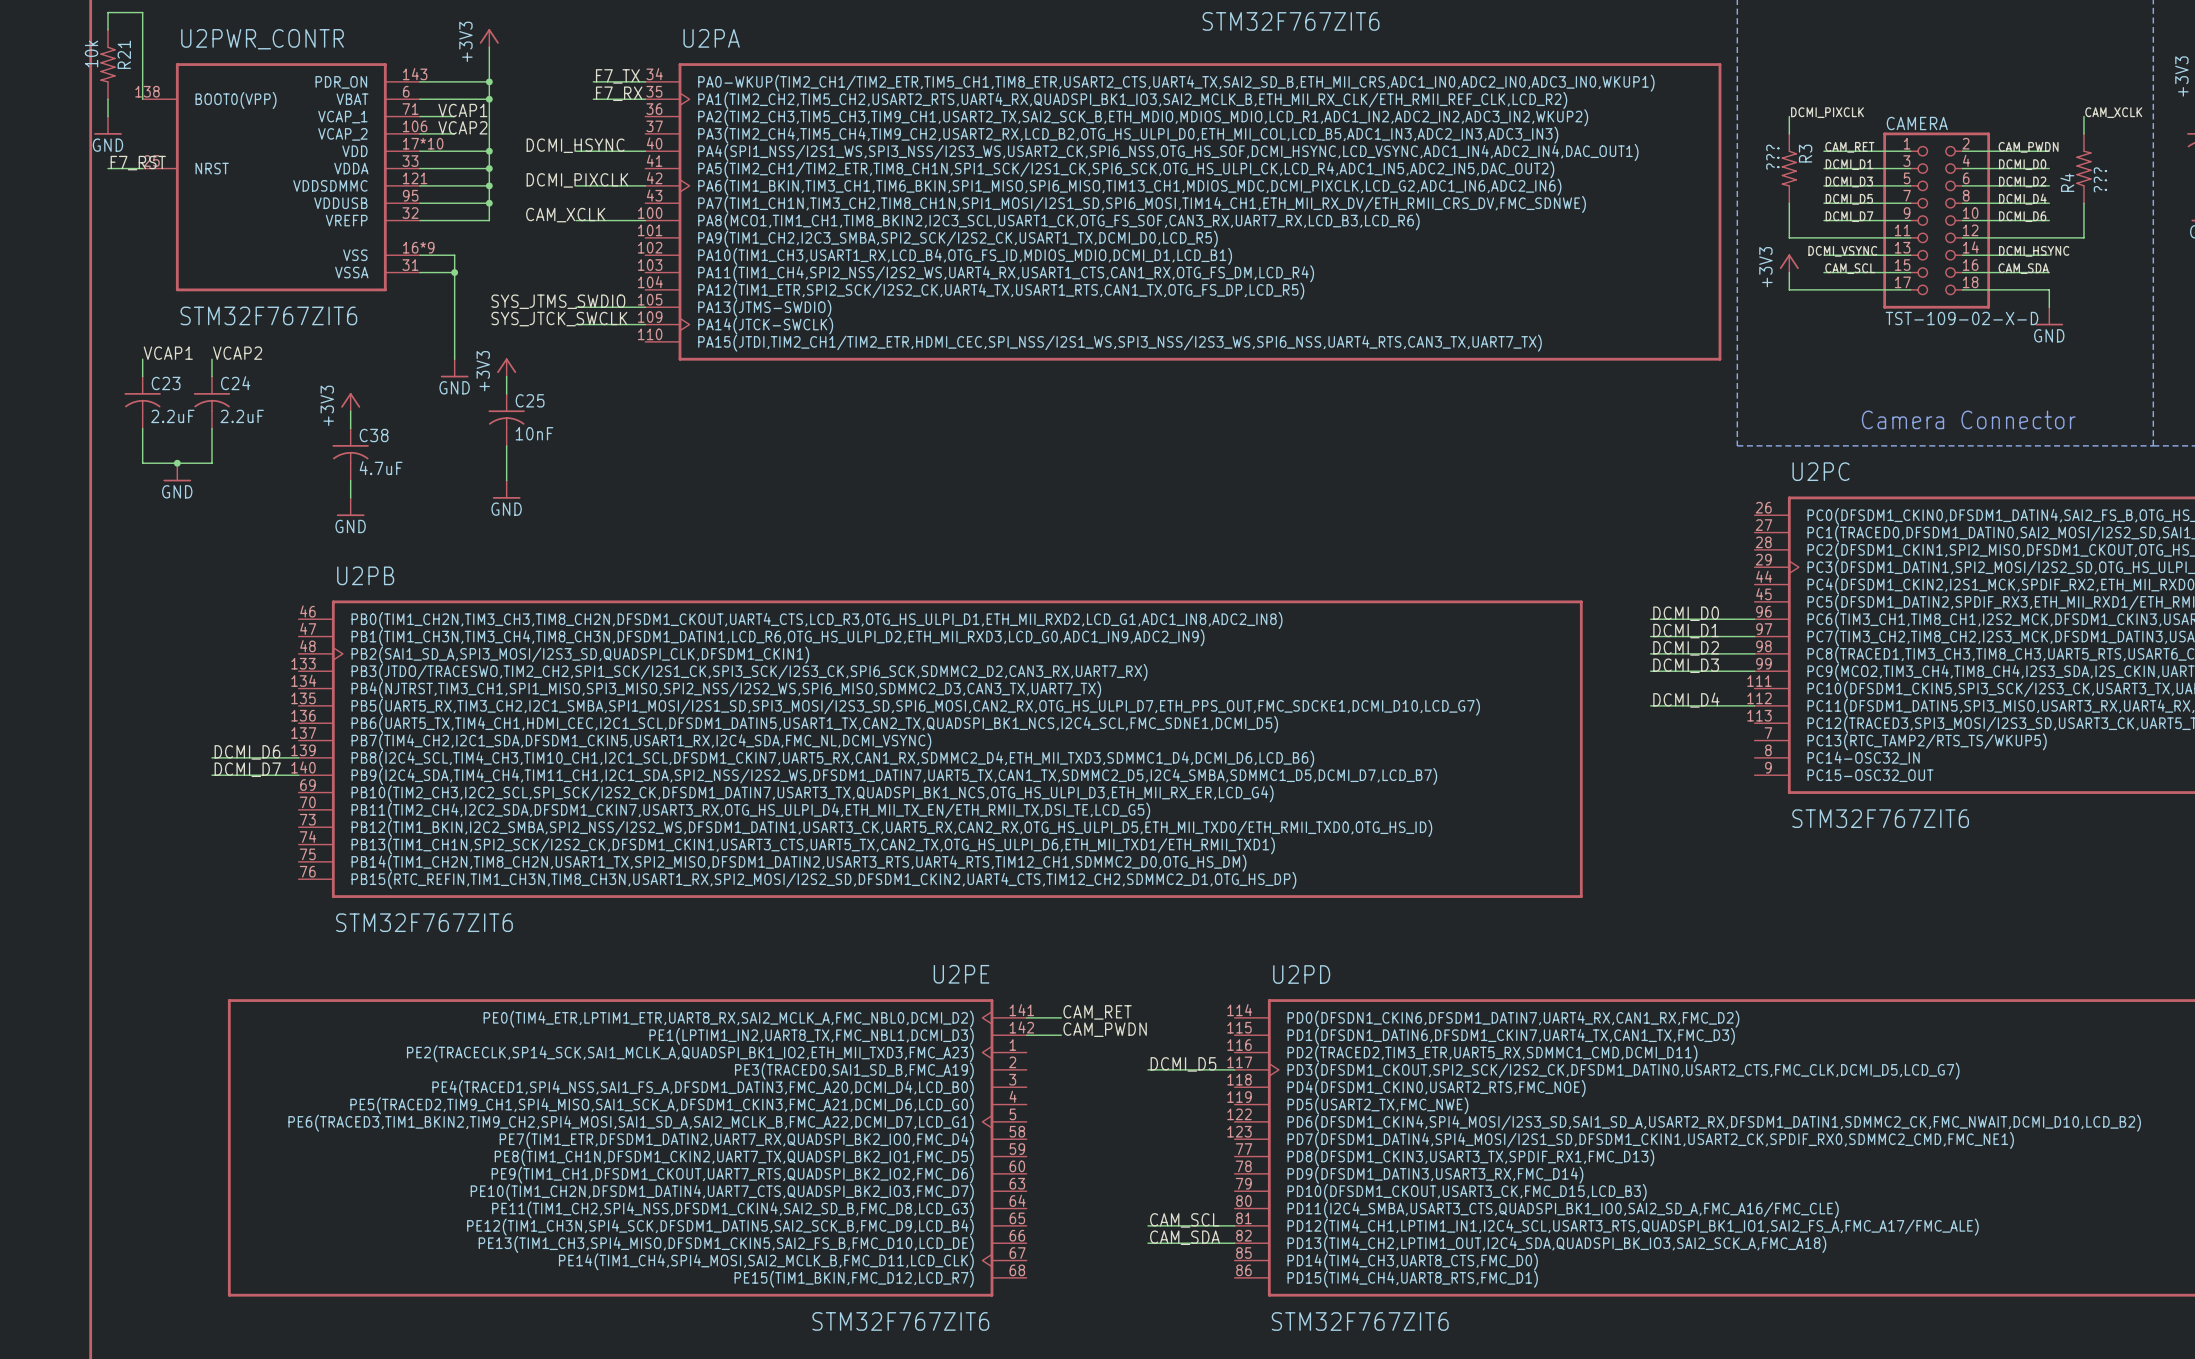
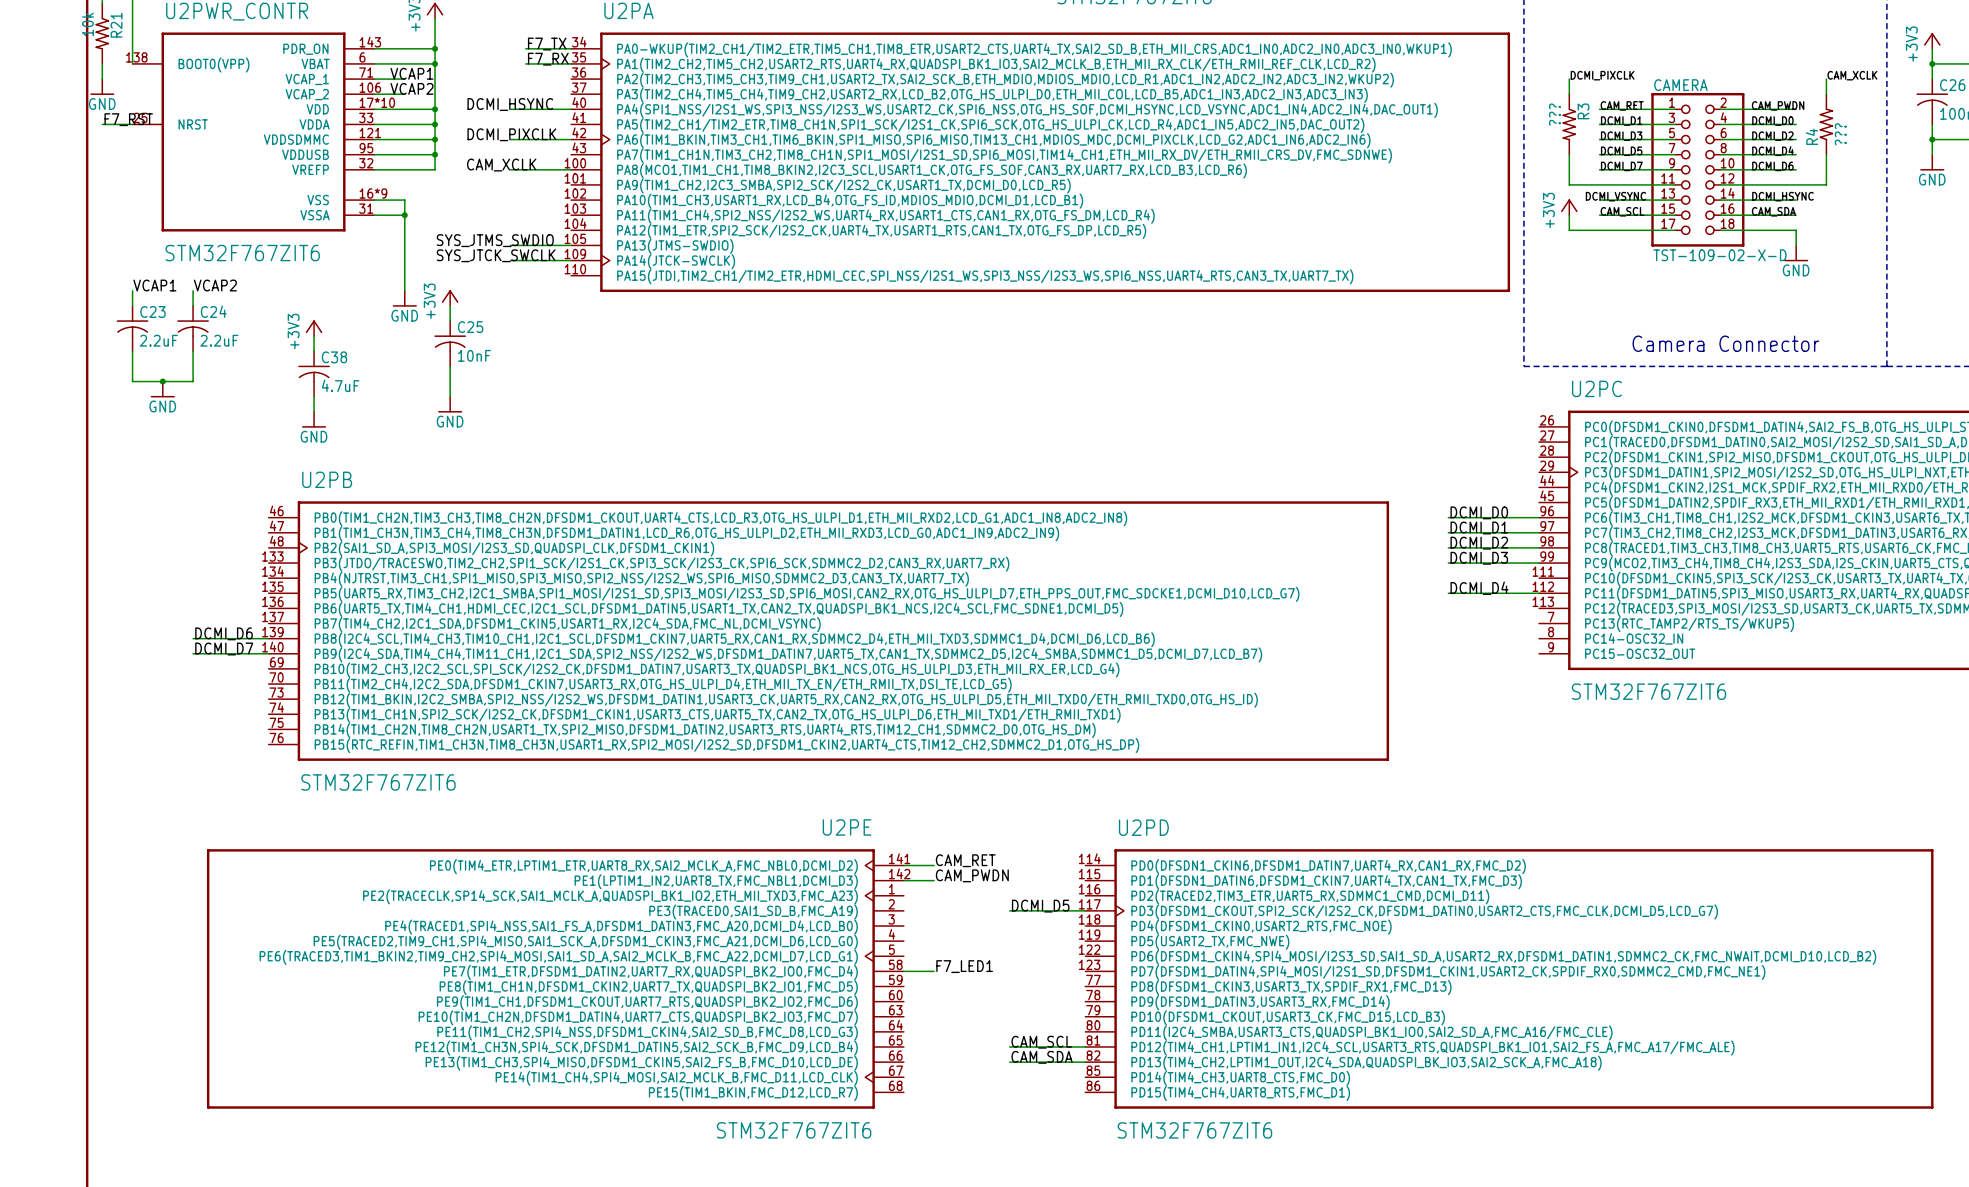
label: none -> F7_LED1 (964, 966)
wire: none -> (903, 971) (934, 971)

